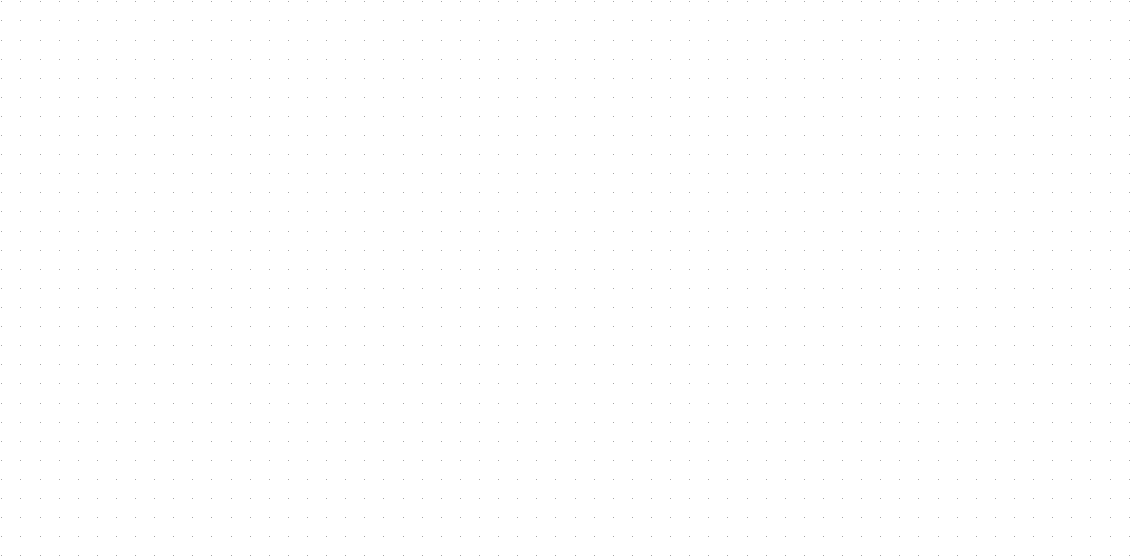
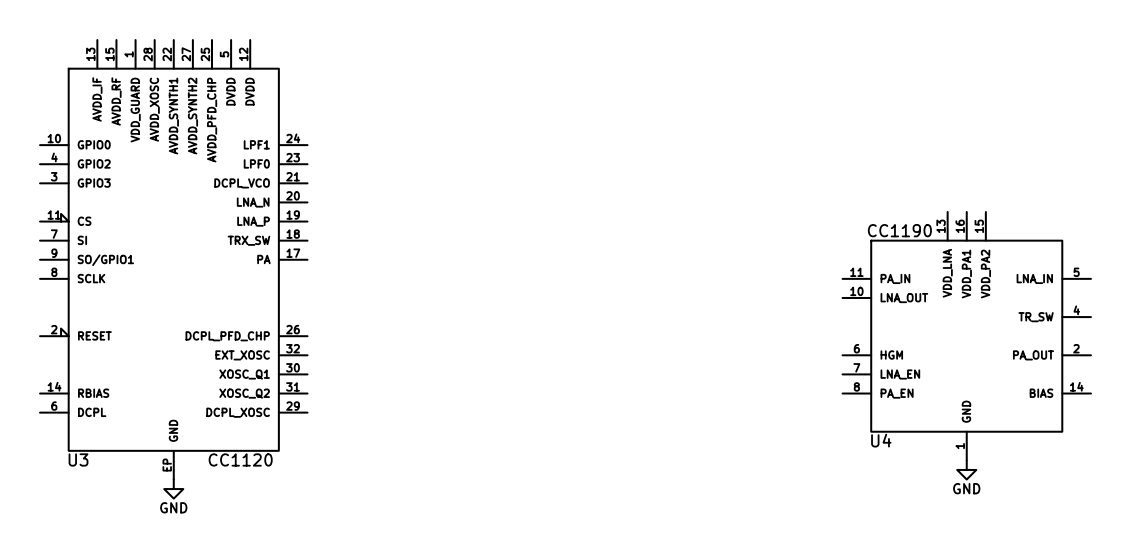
U3: none -> CC1120 (173, 259)
U4: none -> CC1190 (966, 336)
power symbol: none -> GND (966, 469)
power symbol: none -> GND (173, 489)

